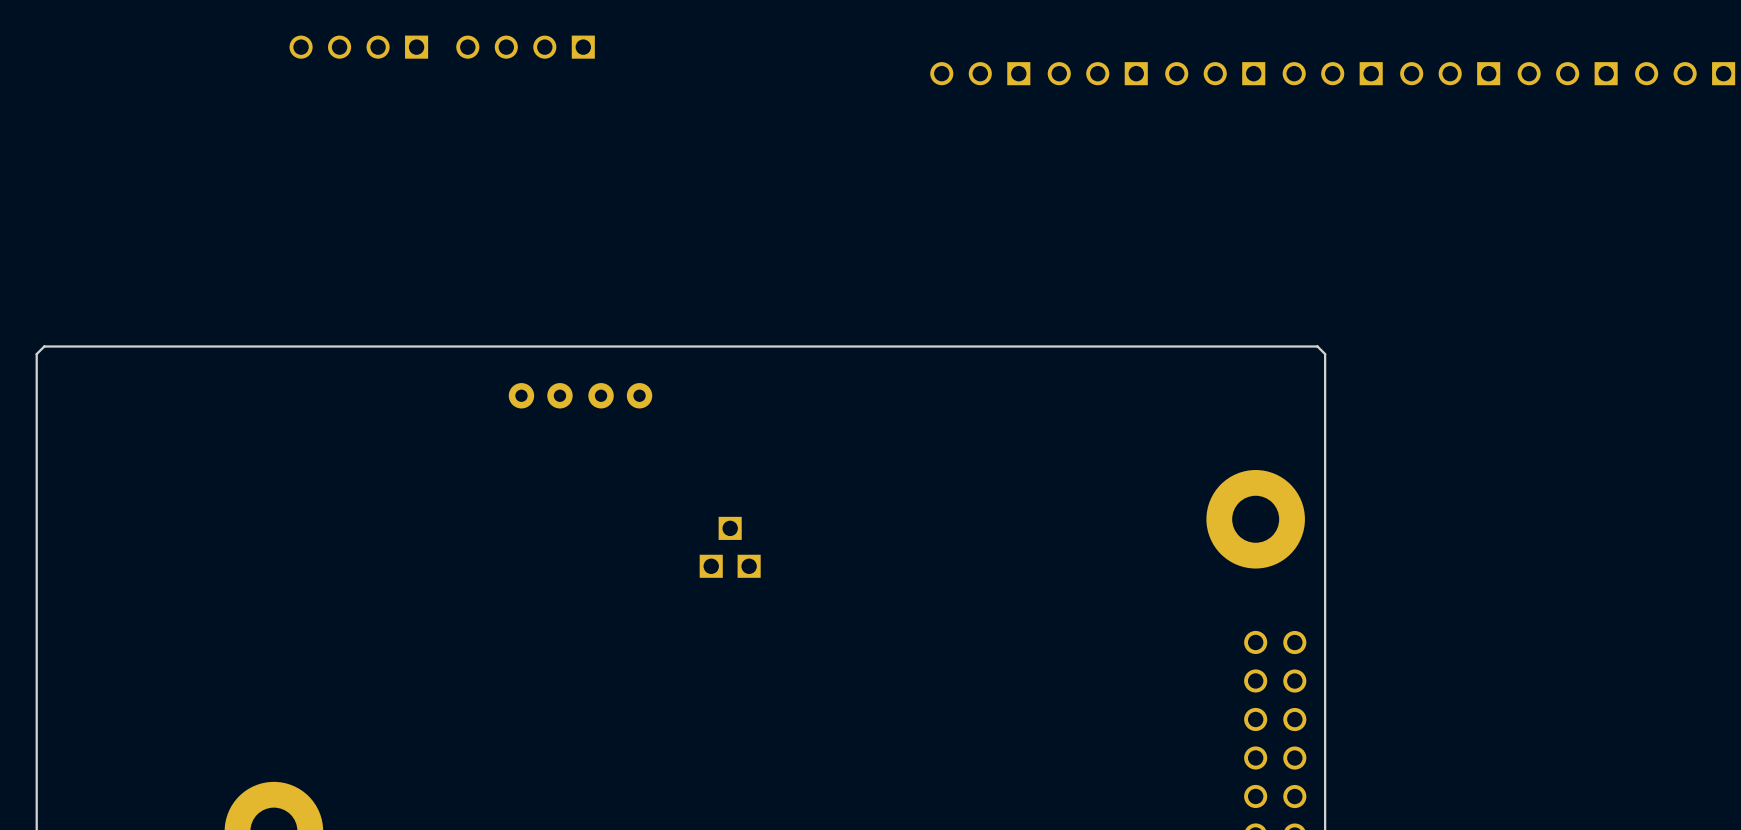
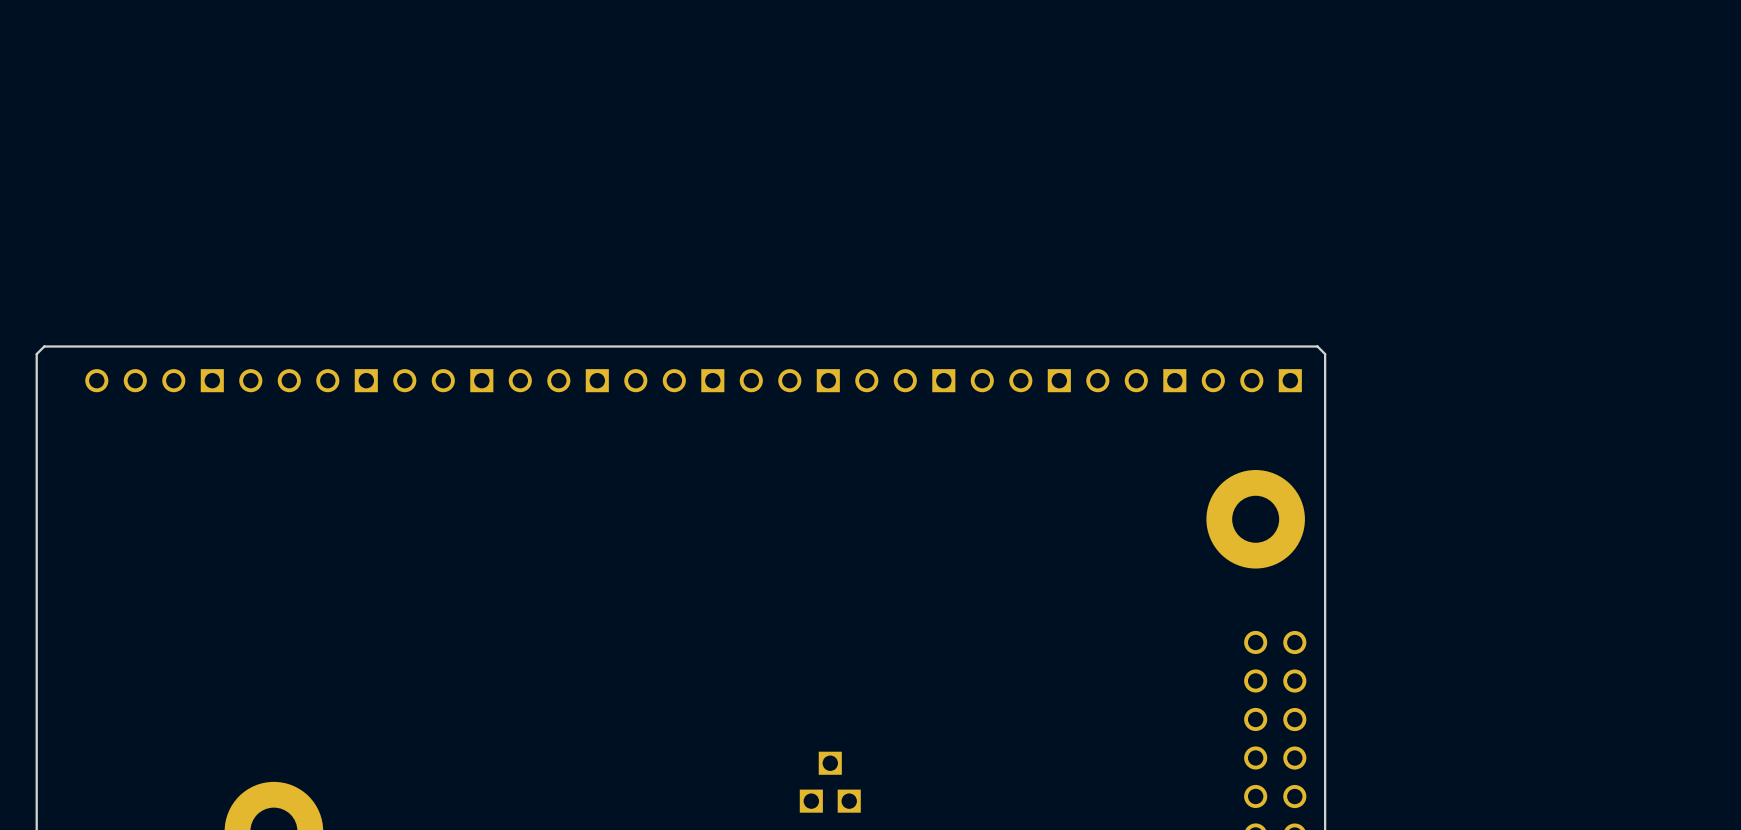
part: (358, 47) -> none
part: (525, 47) -> none
part: (980, 73) -> none
part: (1097, 73) -> none
part: (1215, 73) -> none
part: (1332, 73) -> none
part: (1450, 73) -> none
part: (1567, 73) -> none
part: (1685, 73) -> none
part: none -> (154, 380)
part: none -> (308, 380)
part: none -> (443, 380)
part: none -> (558, 380)
part: none -> (674, 380)
part: none -> (789, 380)
part: none -> (905, 380)
part: none -> (1020, 380)
part: none -> (1136, 380)
part: none -> (1251, 380)
part: (540, 395) -> none
part: (620, 395) -> none
part: (730, 528) -> none
part: (711, 566) -> none
part: (749, 566) -> none
part: none -> (830, 763)
part: none -> (811, 801)
part: none -> (849, 801)

